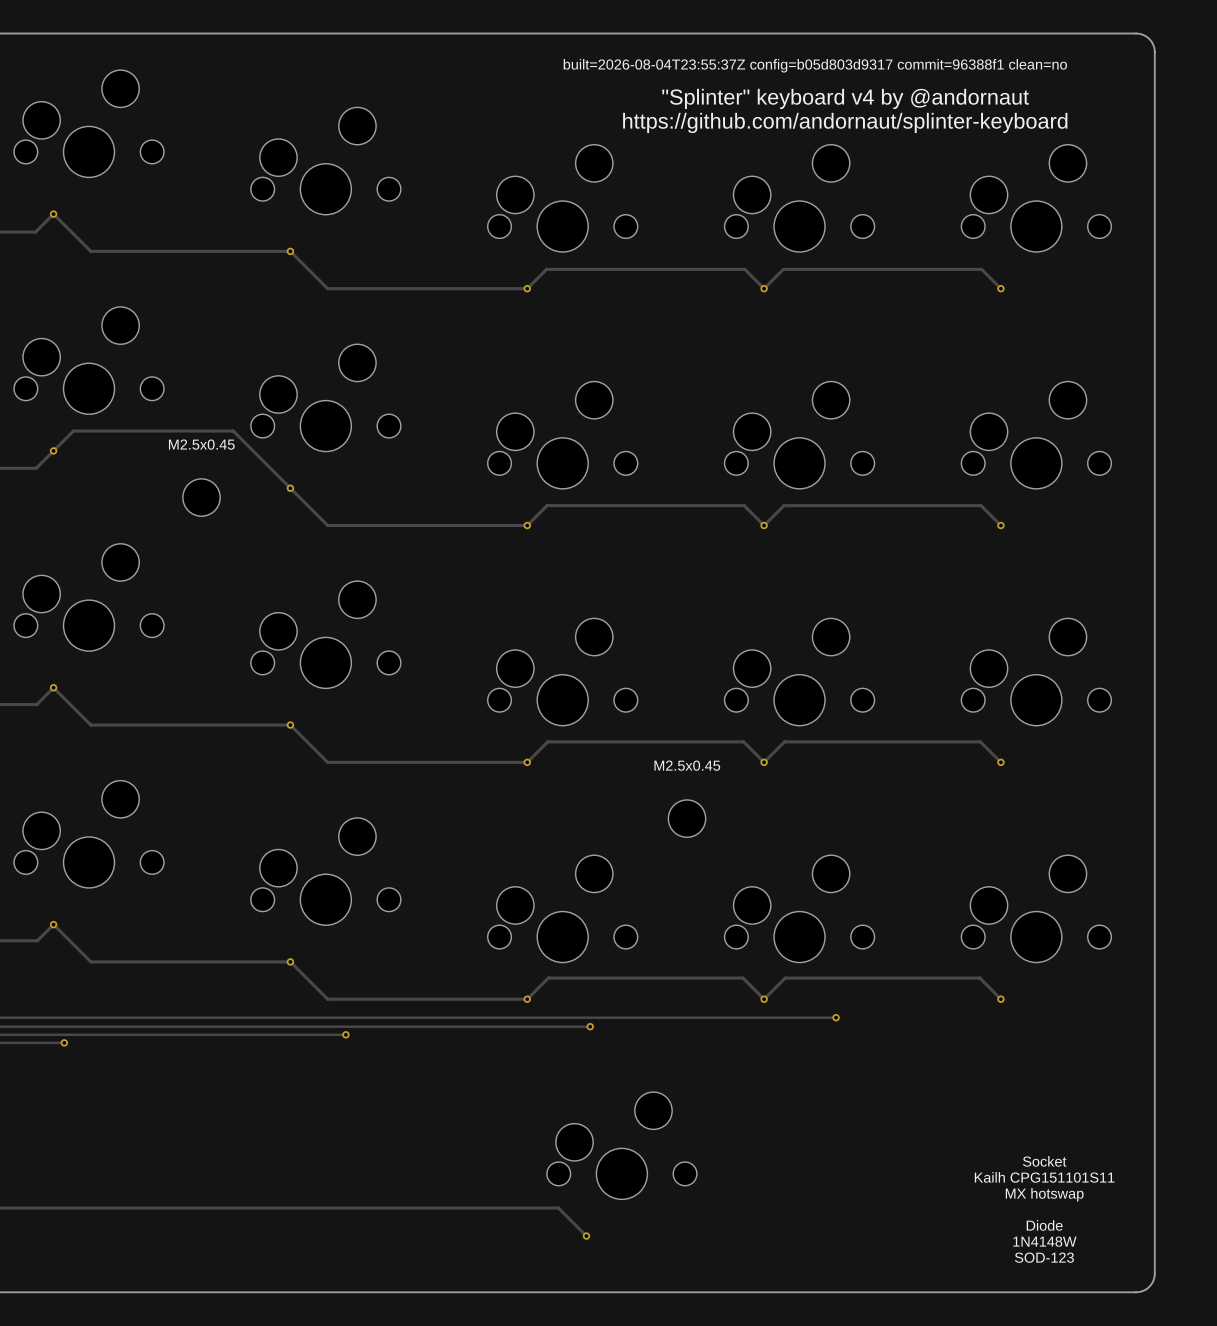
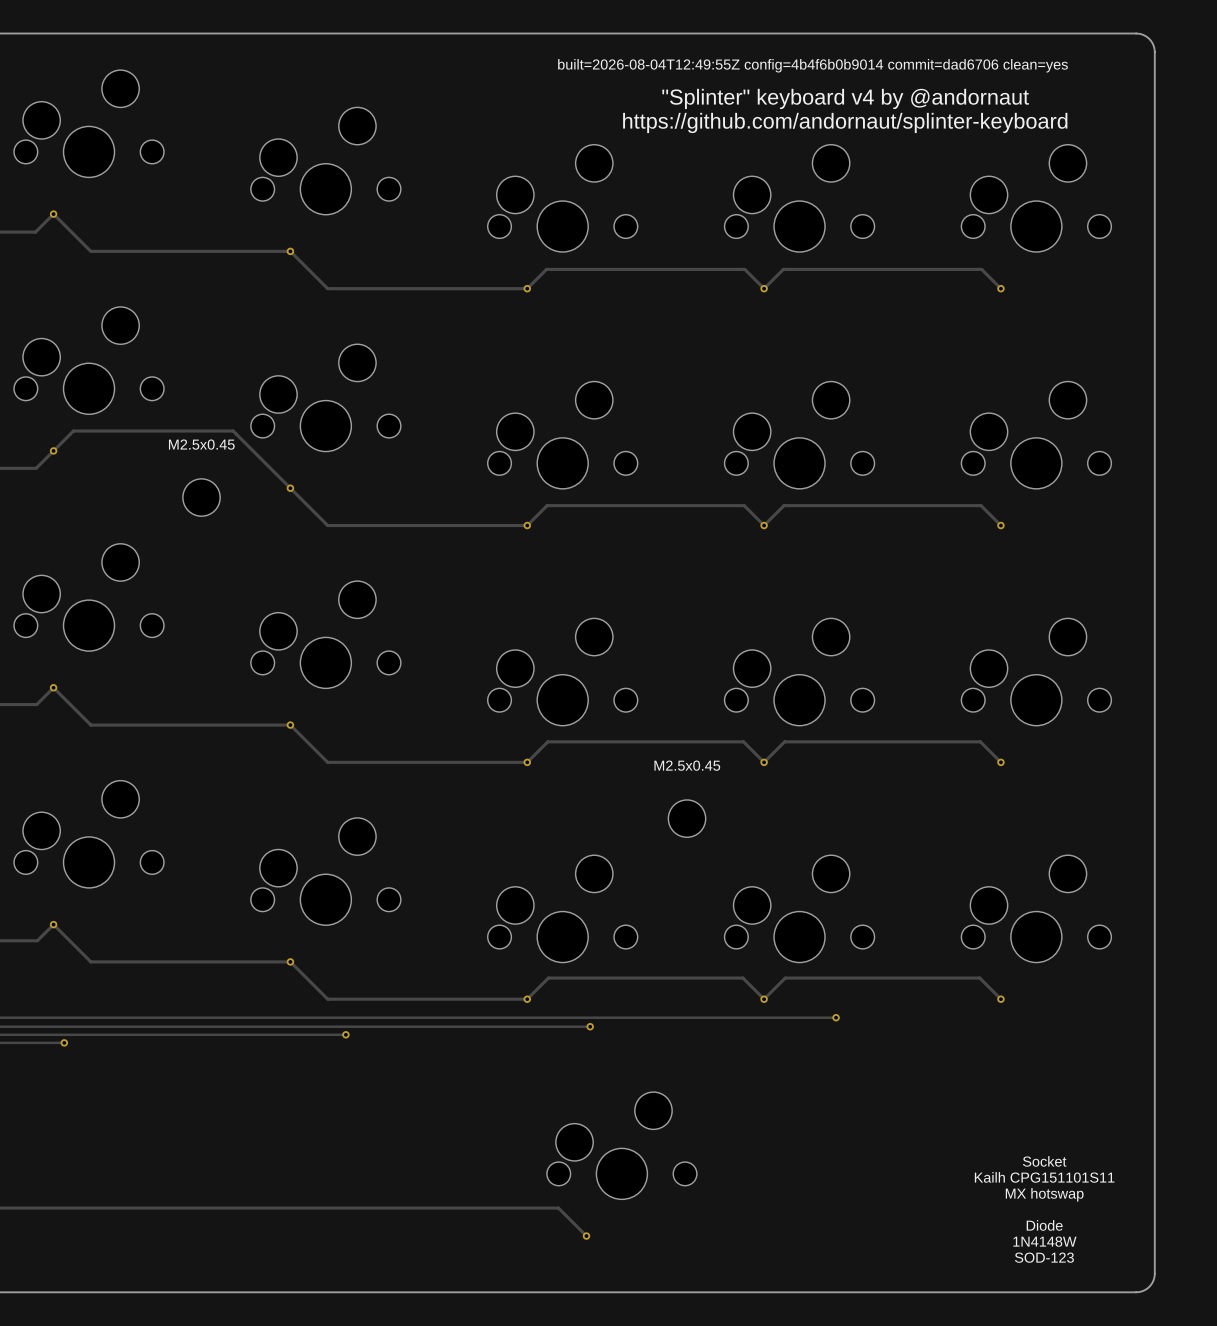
text: built=2026-08-04T23:55:37Z config=b05d803d9317 commit=96388f1 clean=no (815, 65) -> built=2026-08-04T12:49:55Z config=4b4f6b0b9014 commit=dad6706 clean=yes (813, 65)

